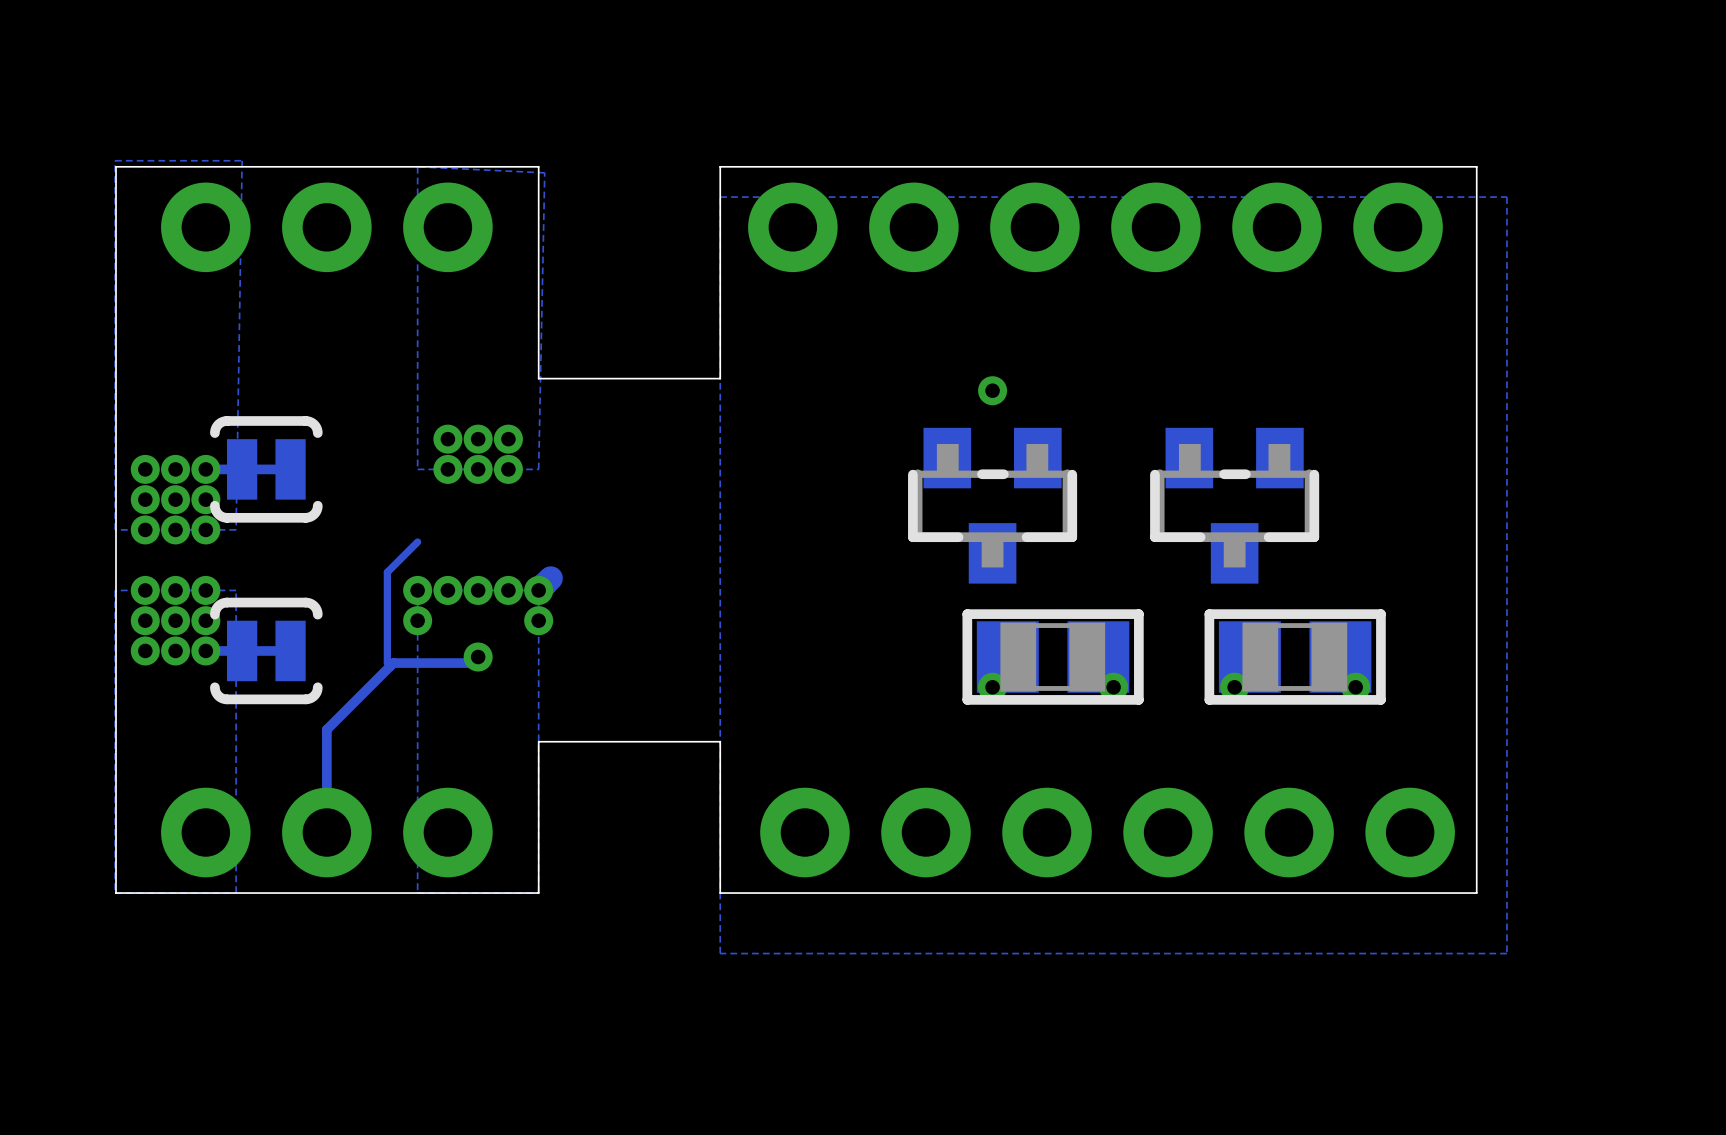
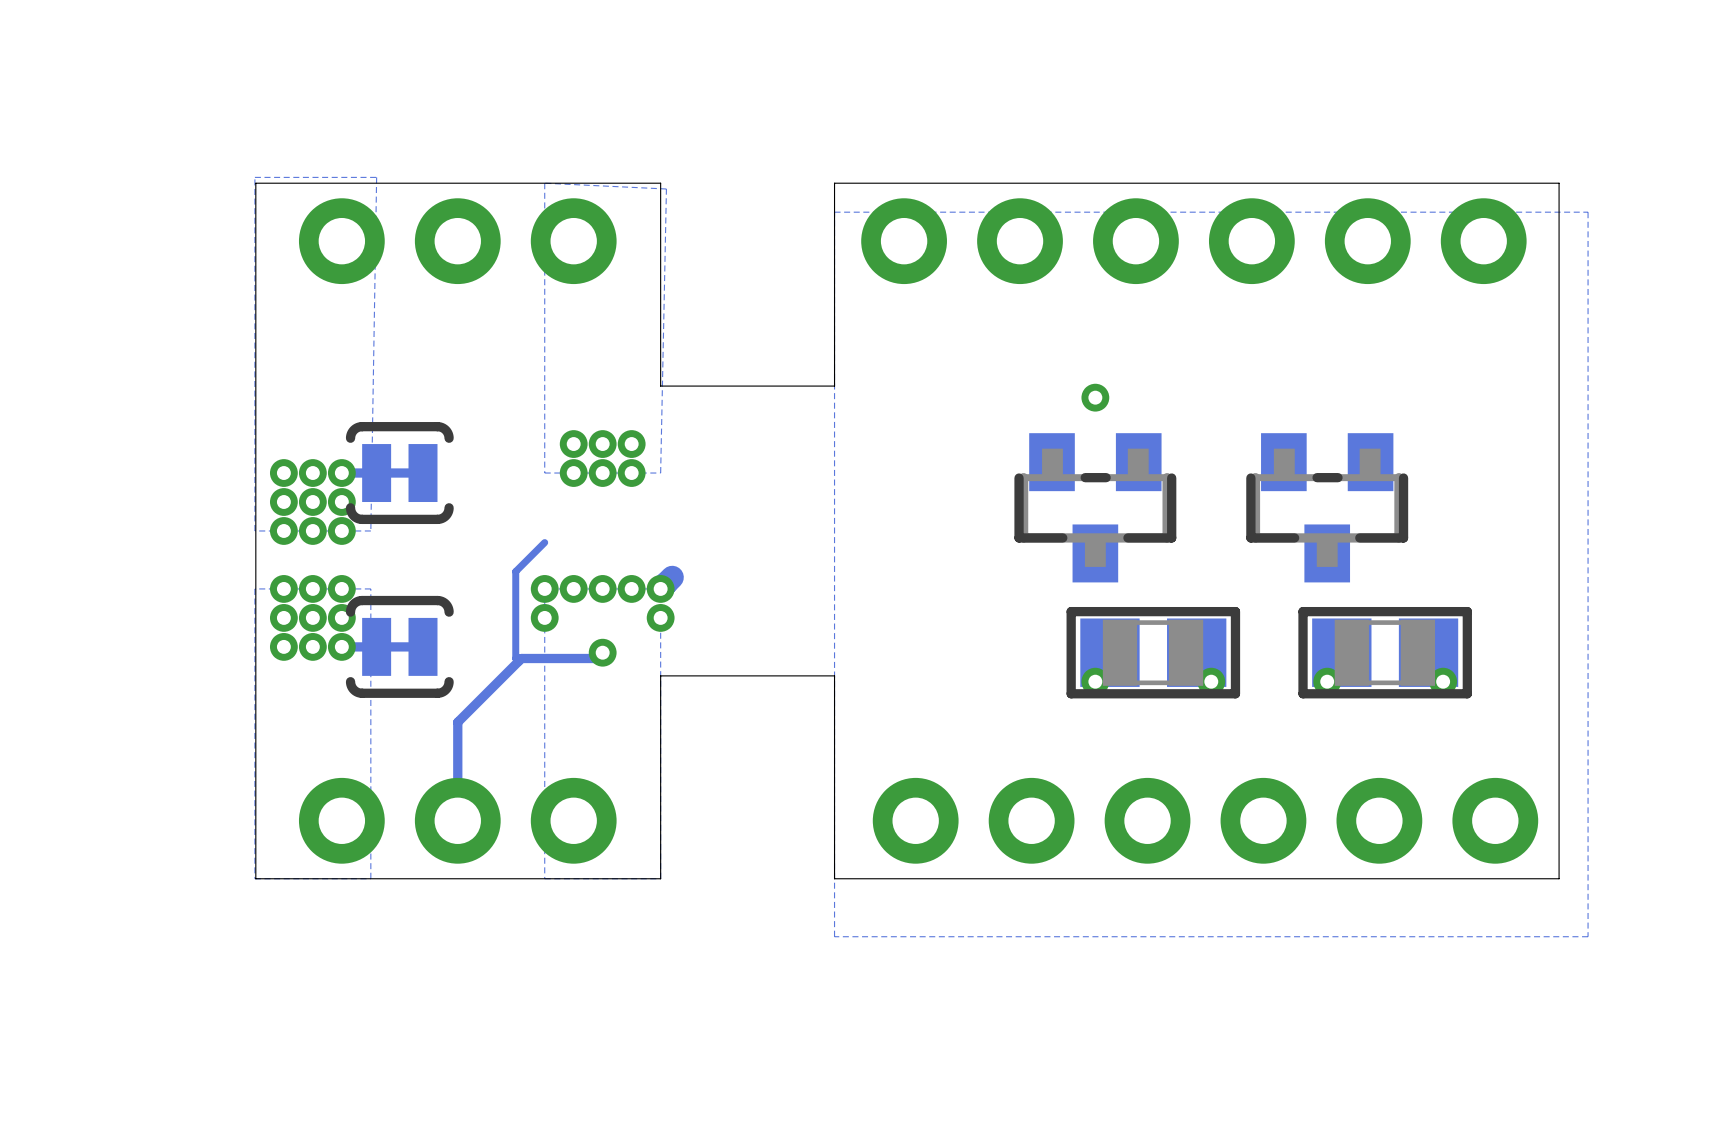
board edge: (720, 741) (538, 741) -> (834, 733) (834, 675) (660, 675) (660, 733)

